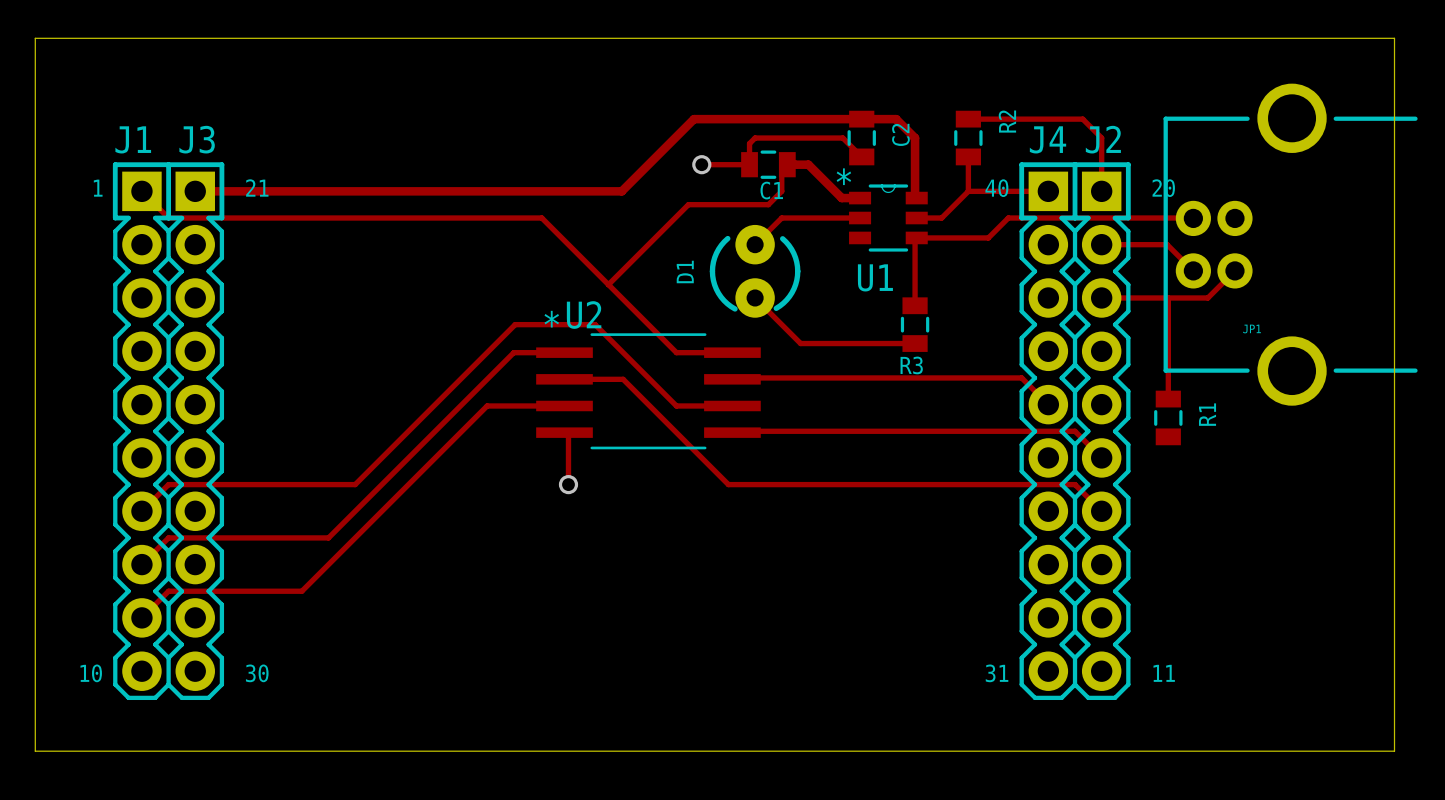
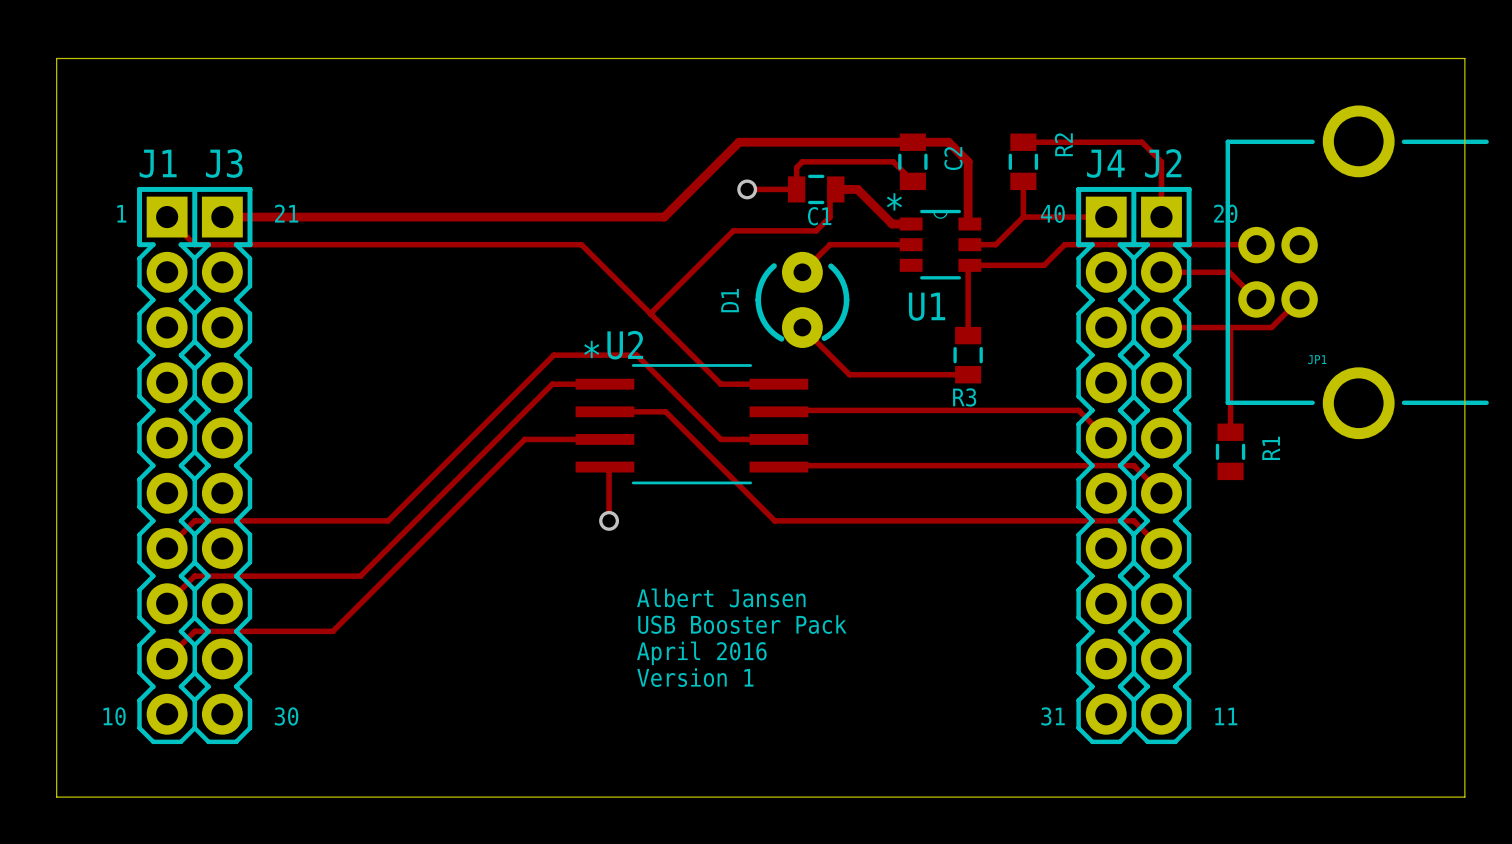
text: none -> Albert Jansen (721, 597)
text: none -> USB Booster Pack (742, 624)
text: none -> April 2016 (701, 653)
text: none -> Version 1 (695, 677)

